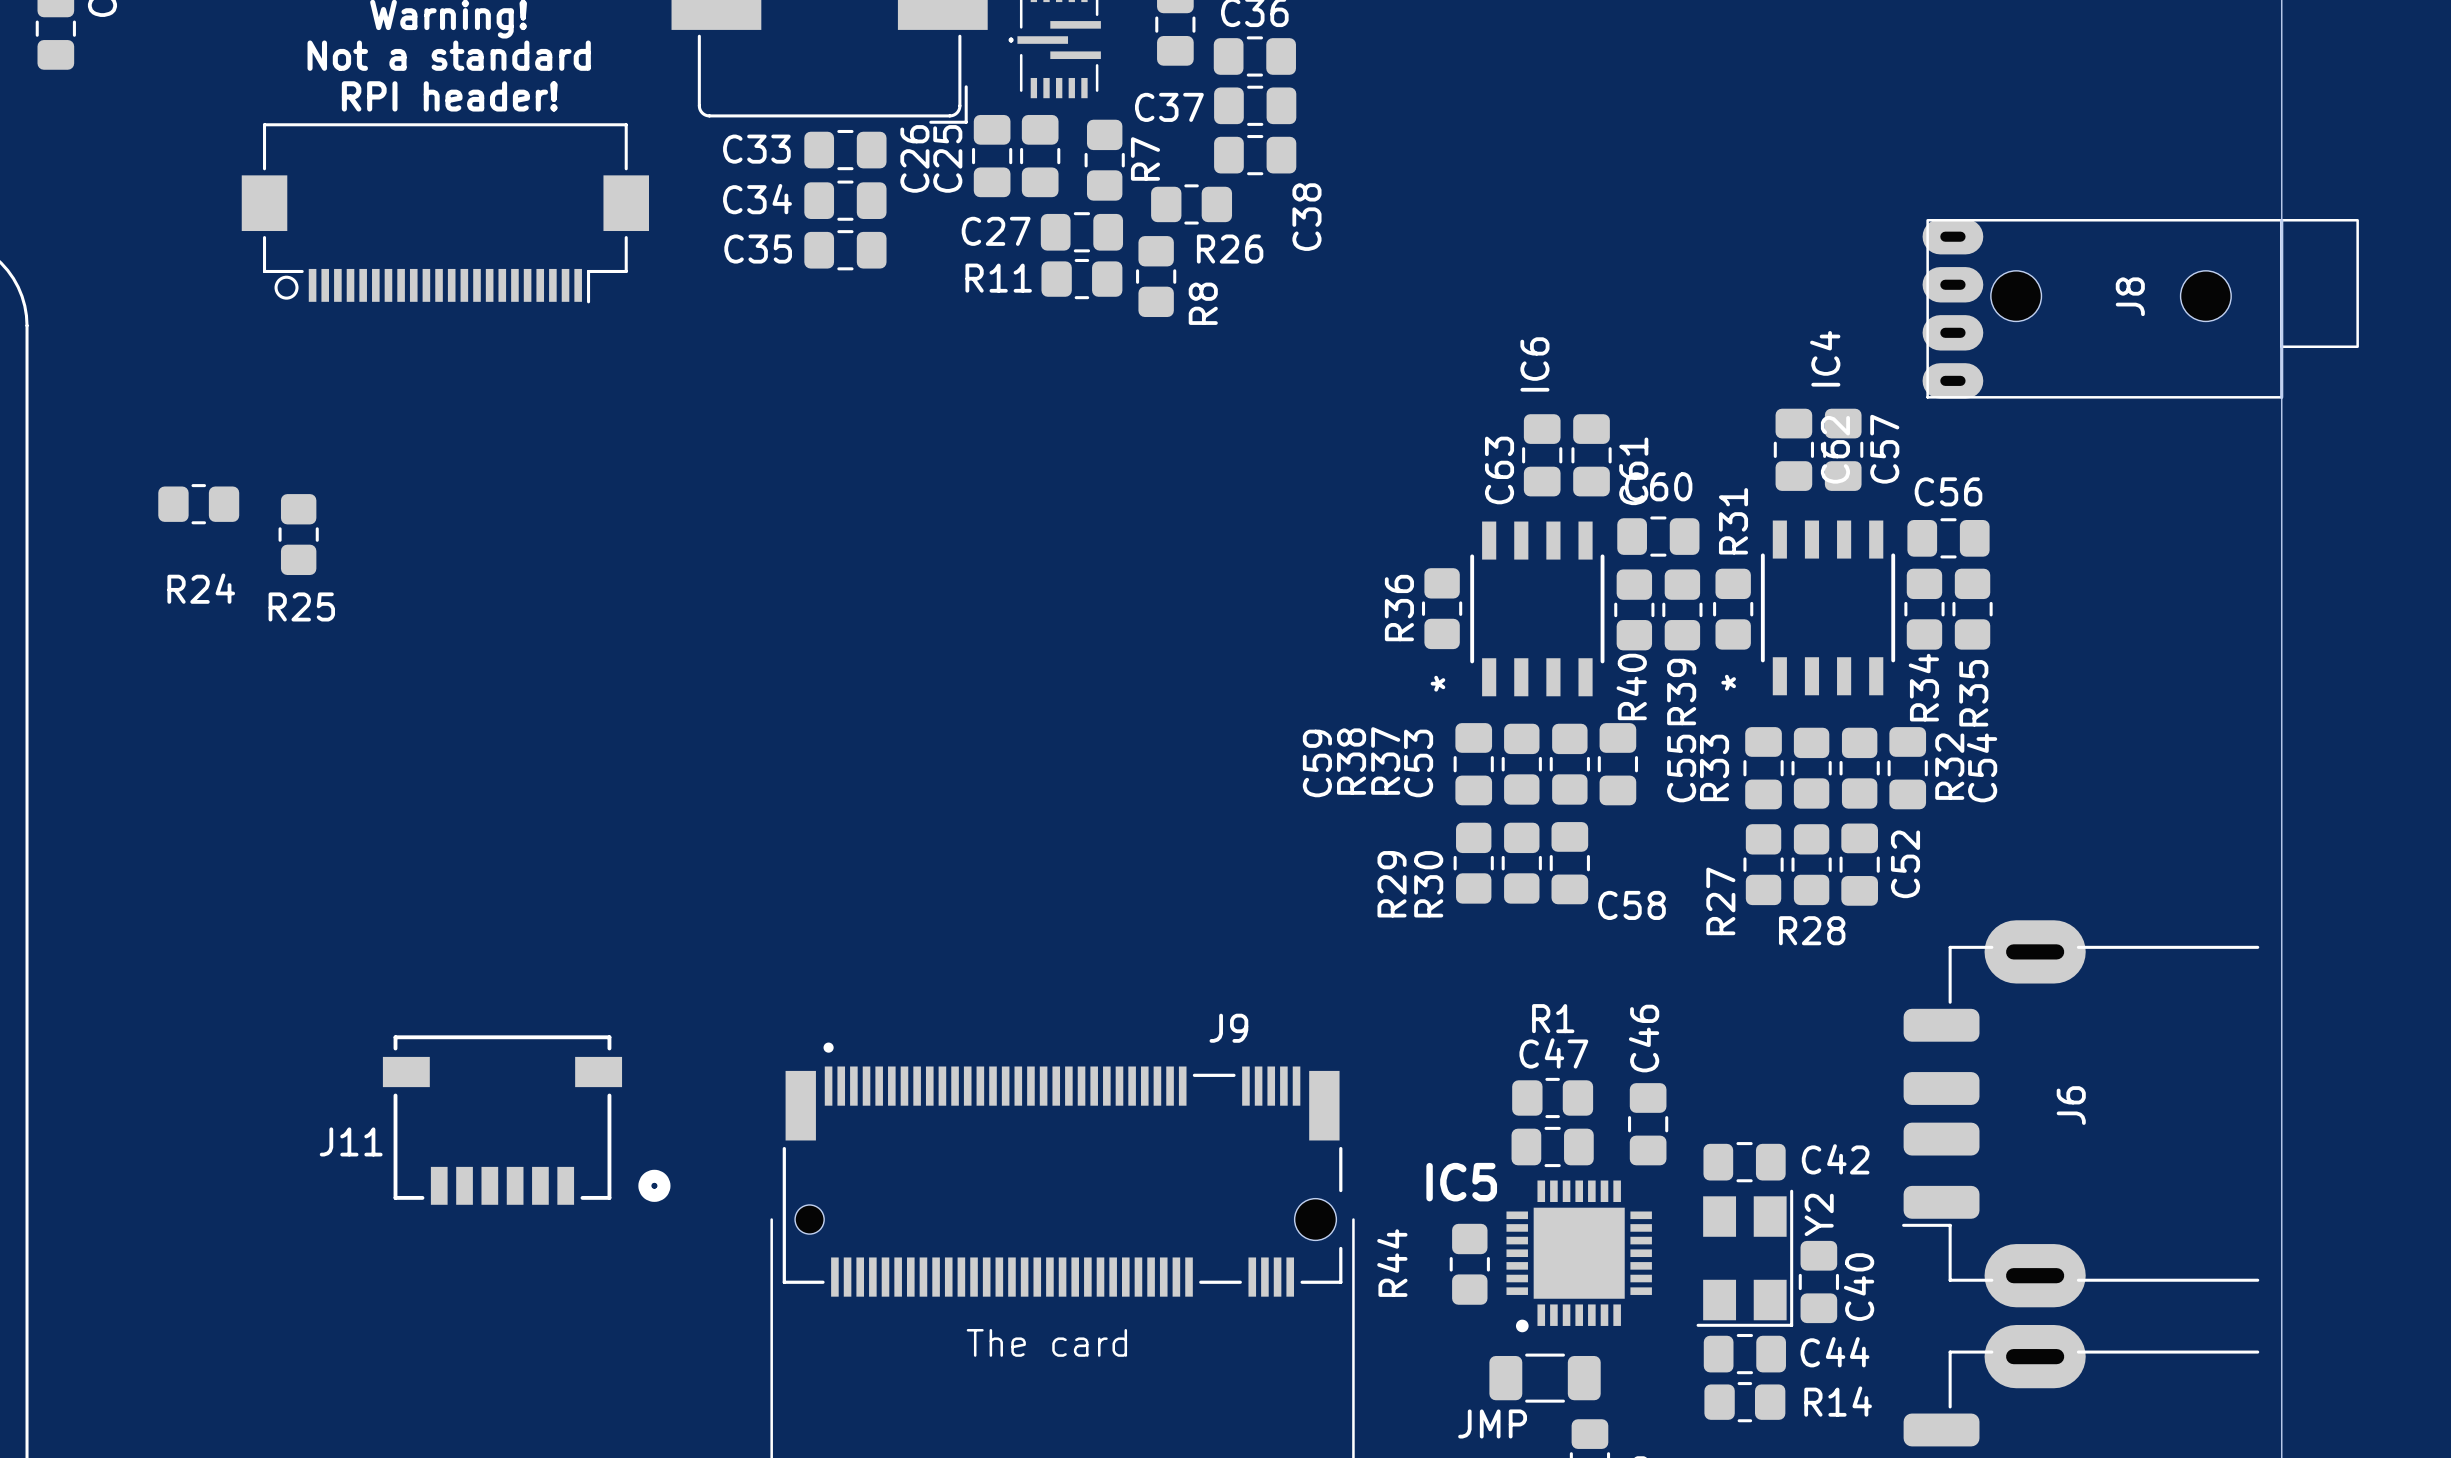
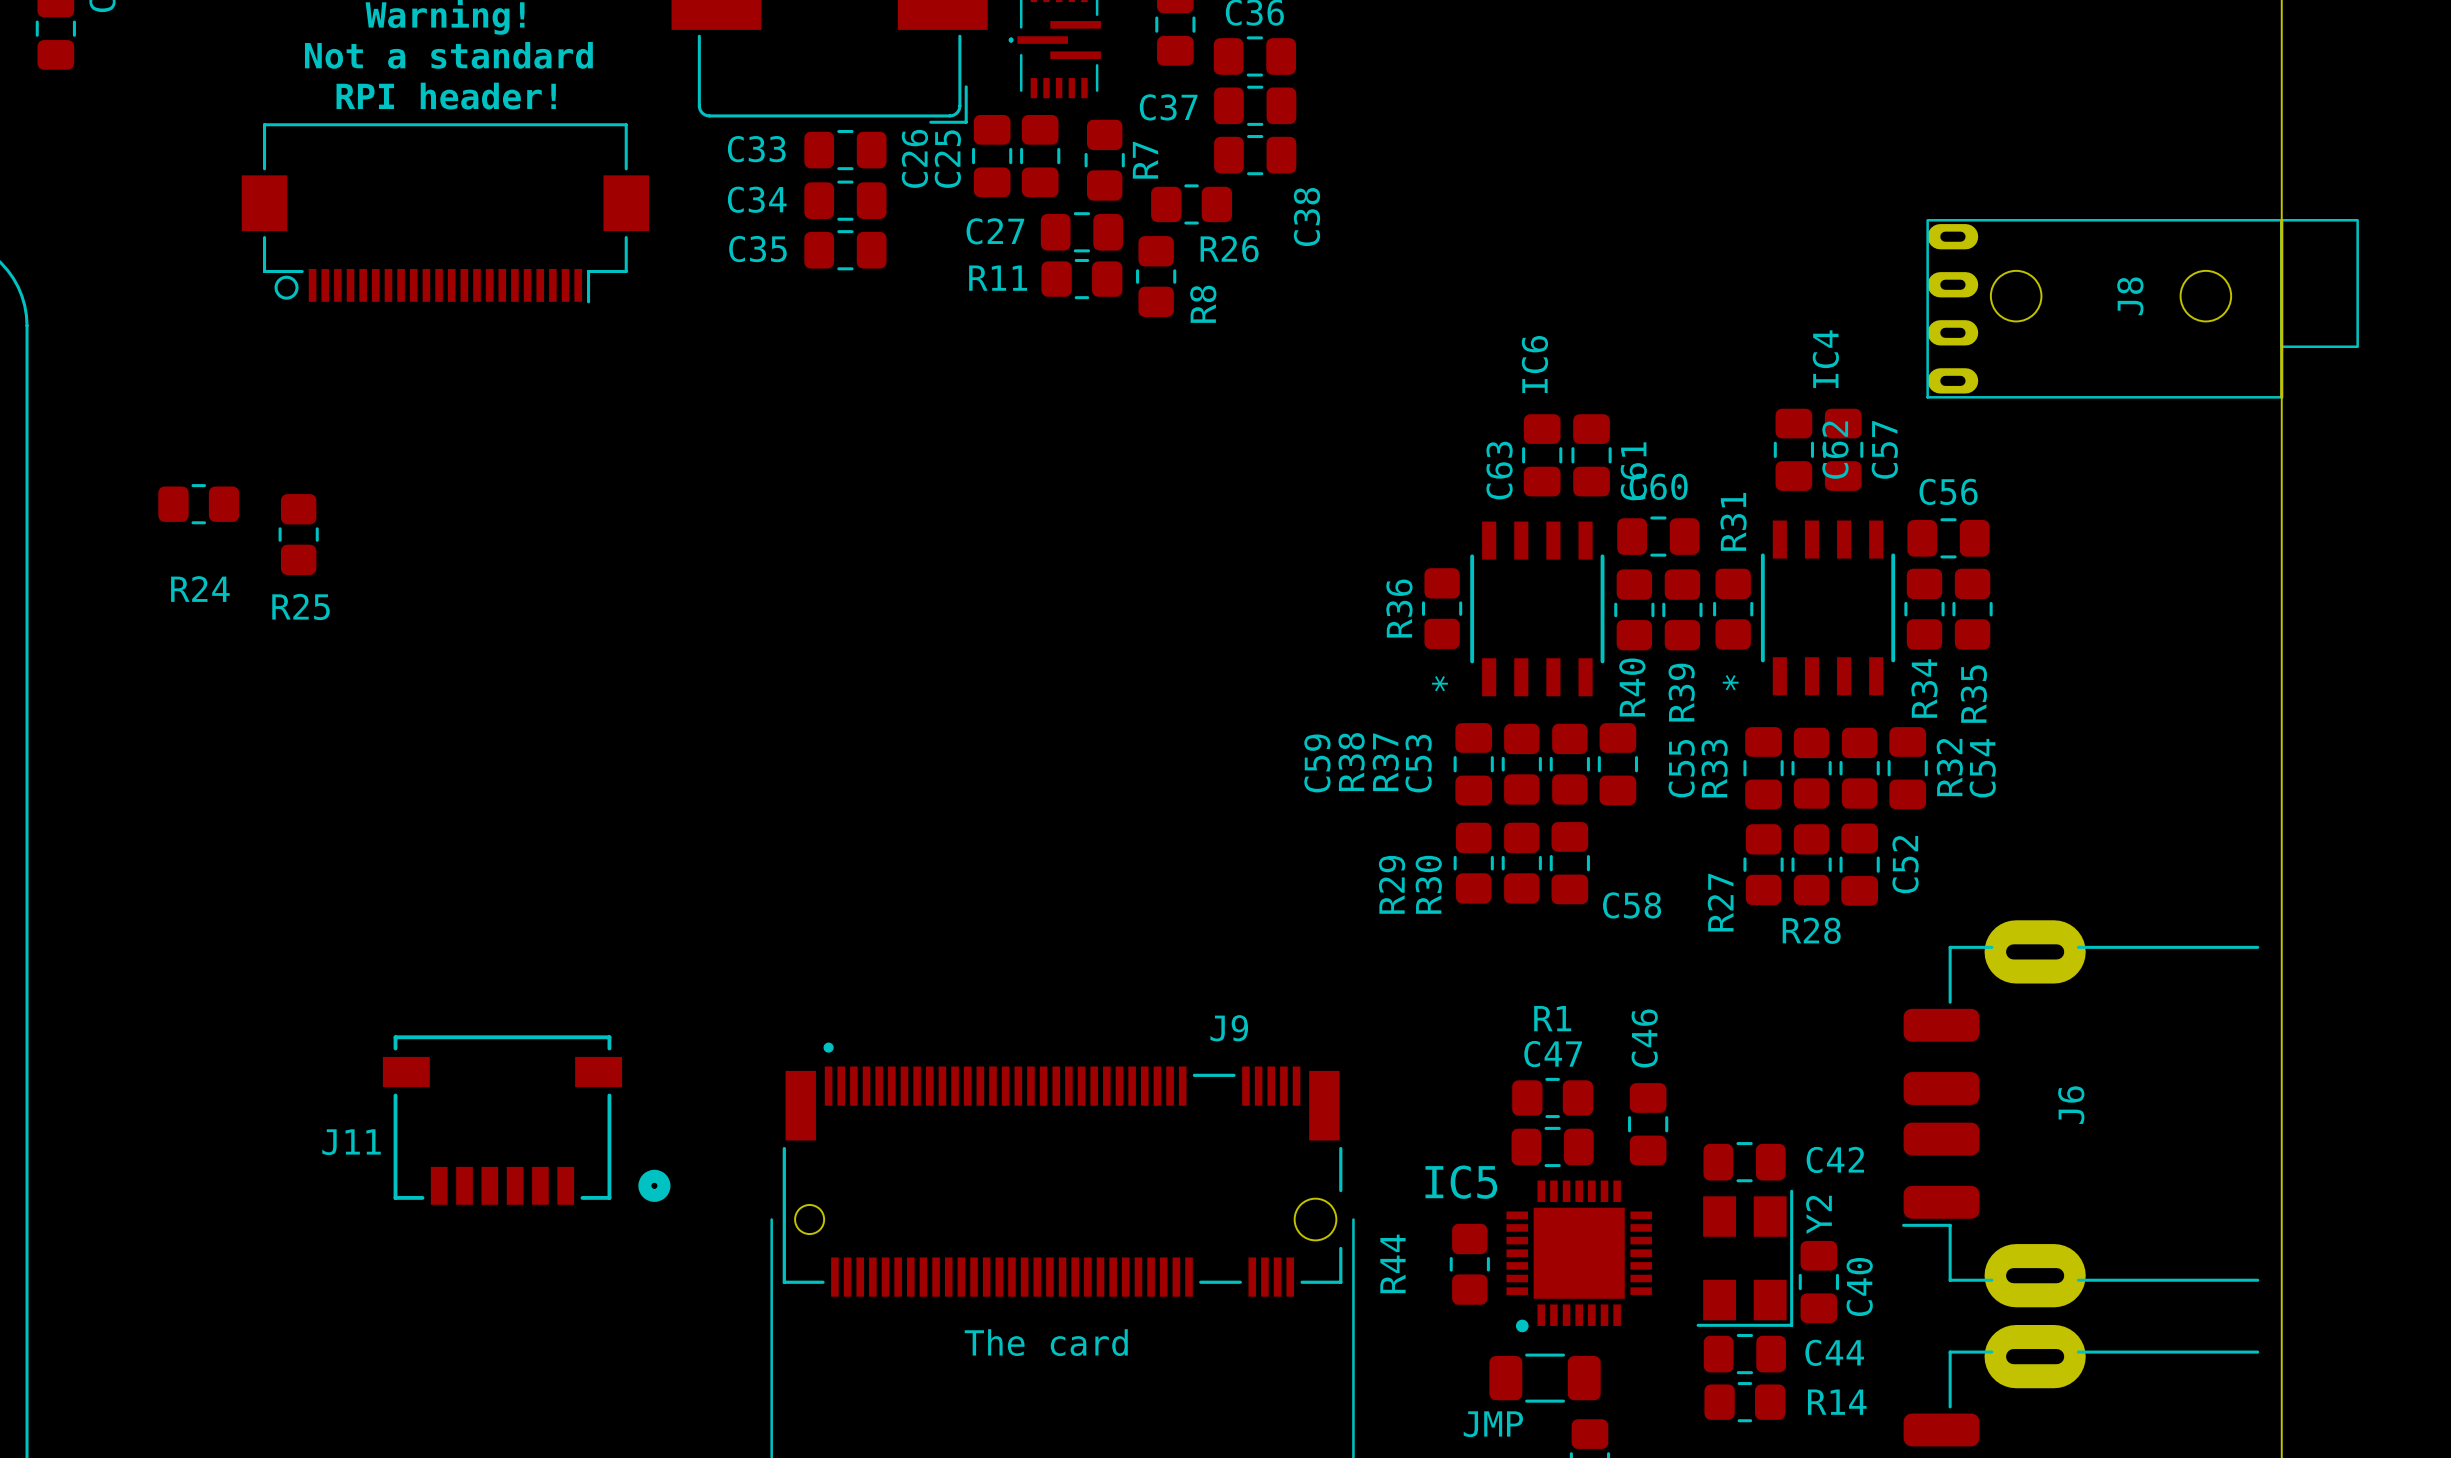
J8 footprint: [1922, 218, 2359, 399] -> [1926, 218, 2359, 399]

